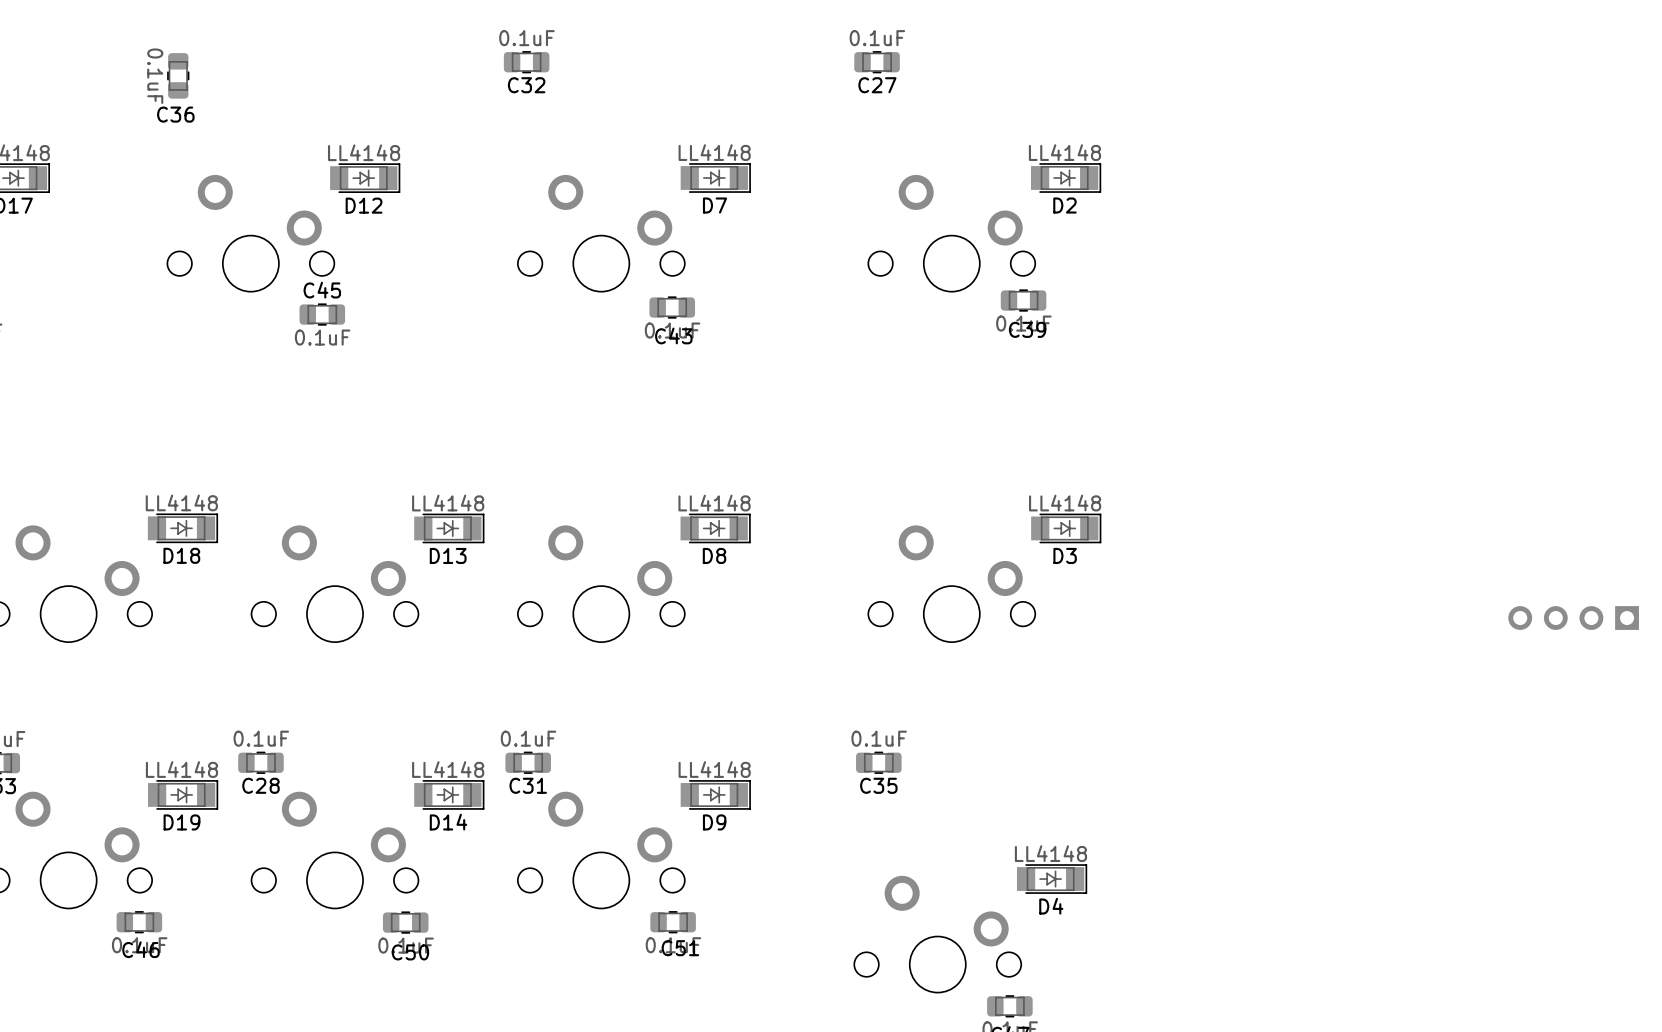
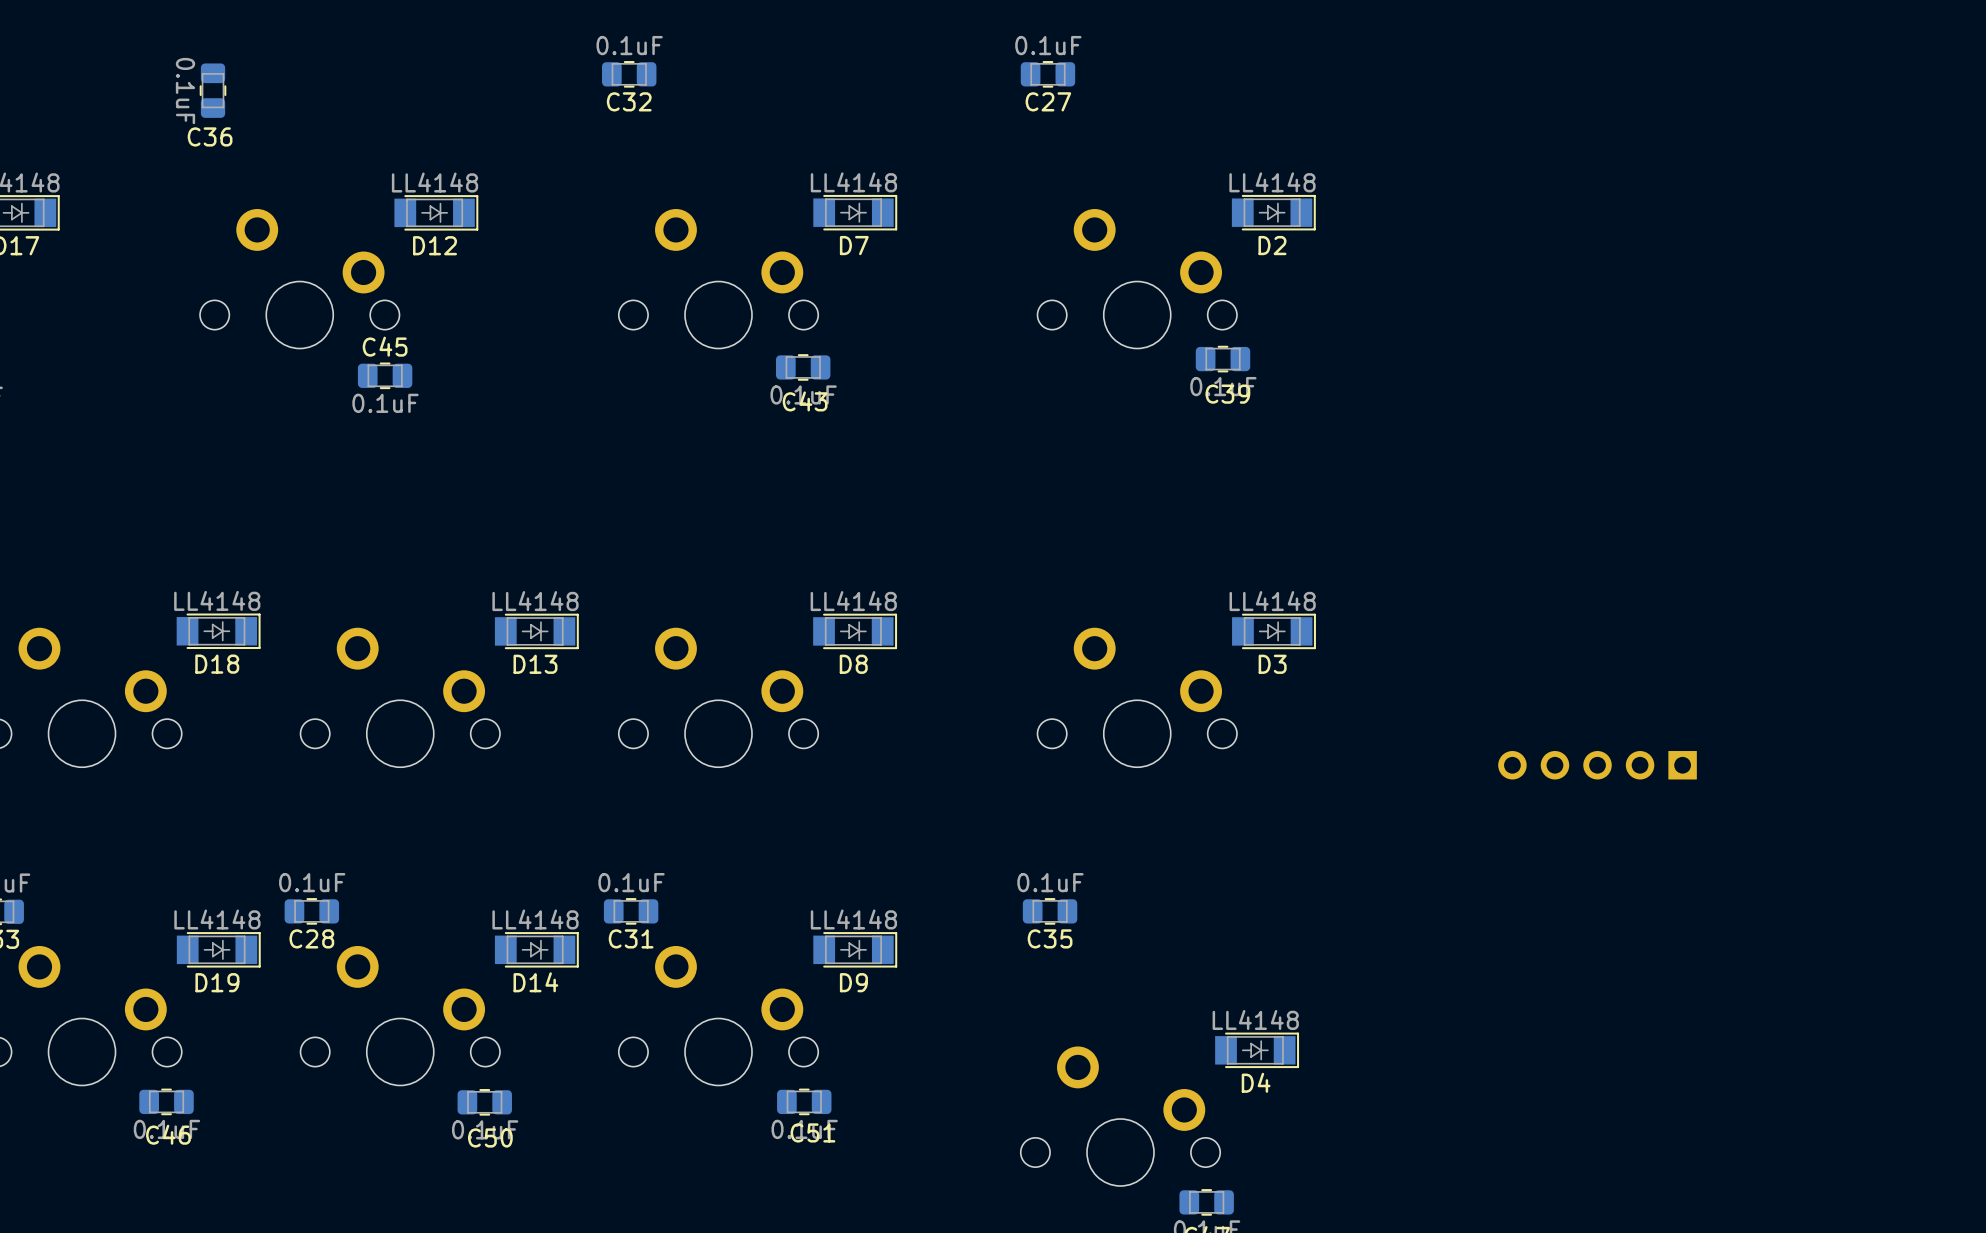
part: (1573, 618) -> none
part: none -> (1597, 765)

